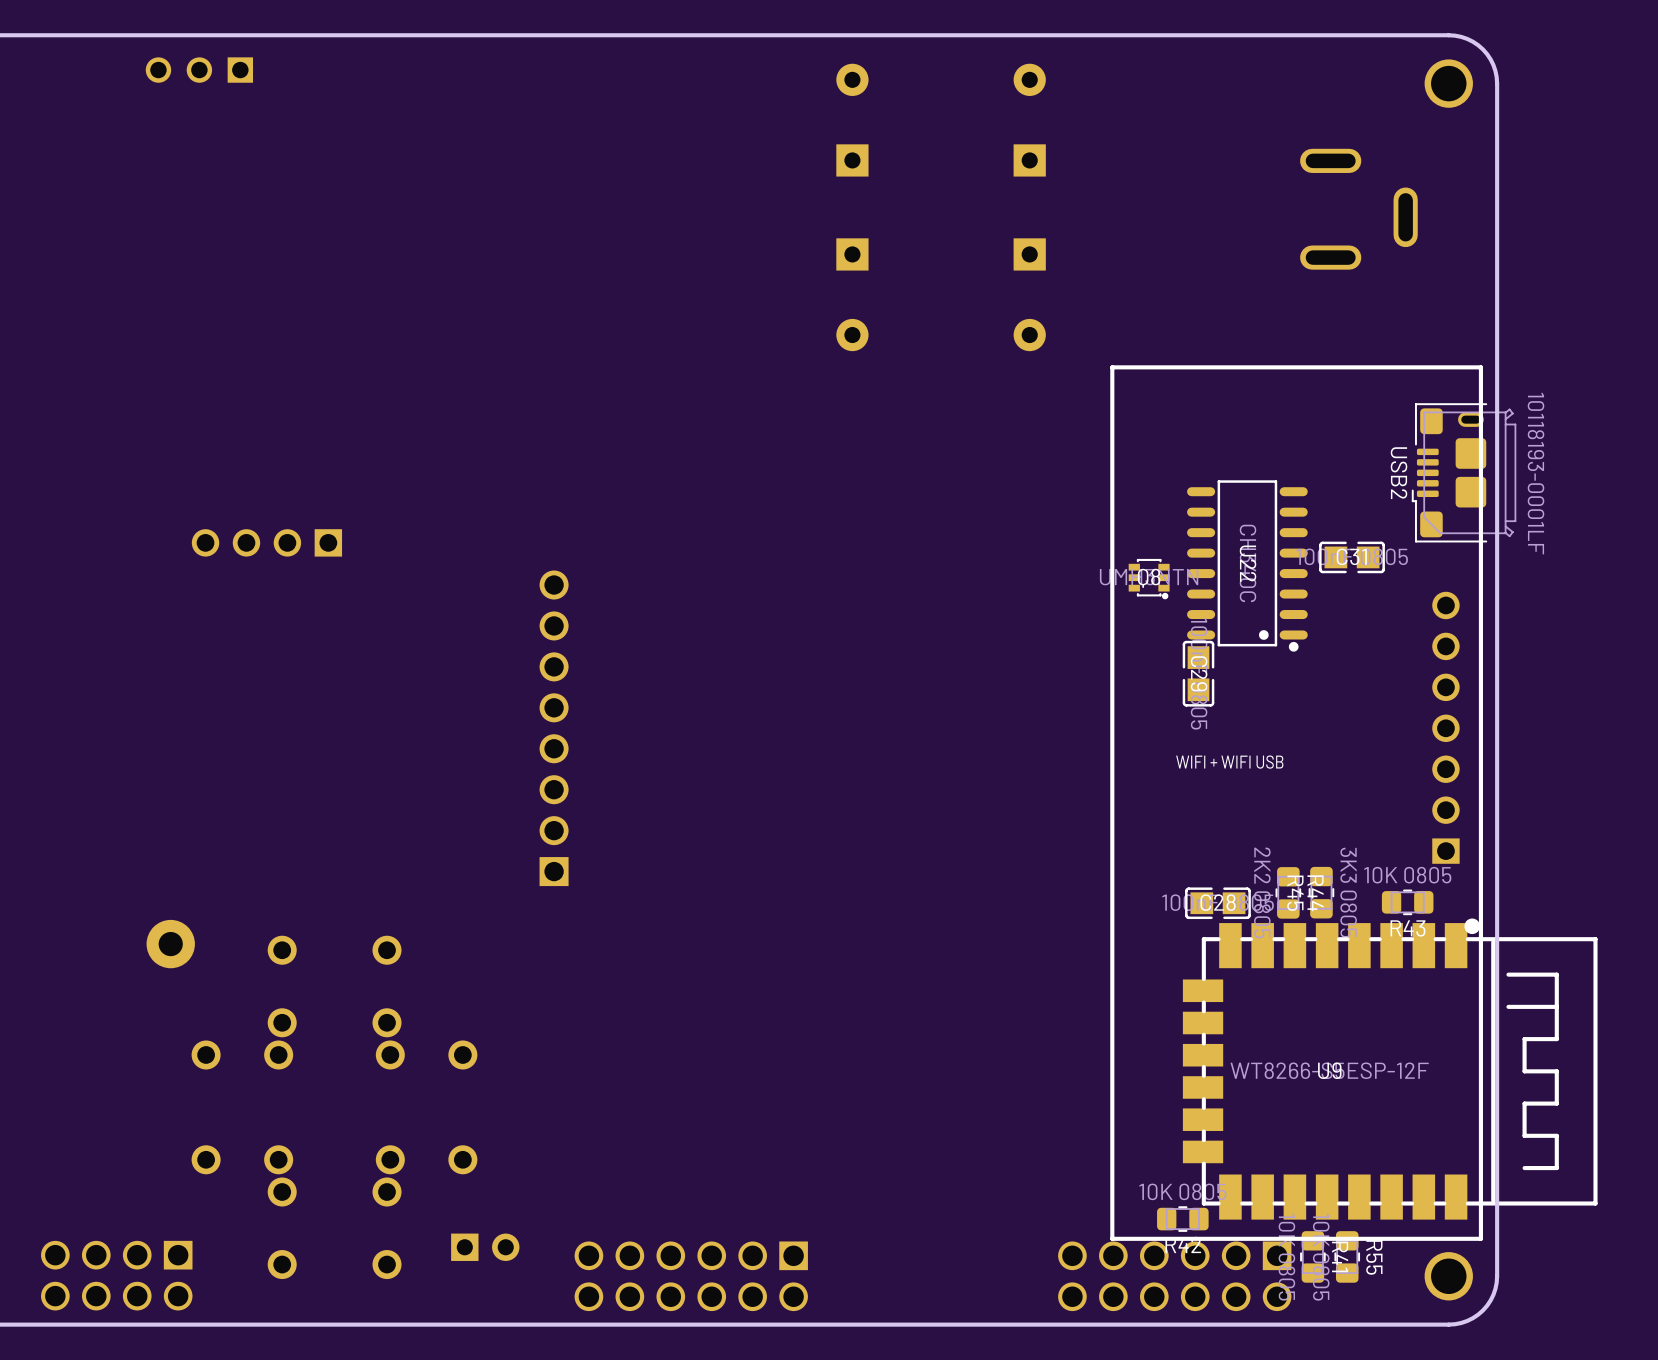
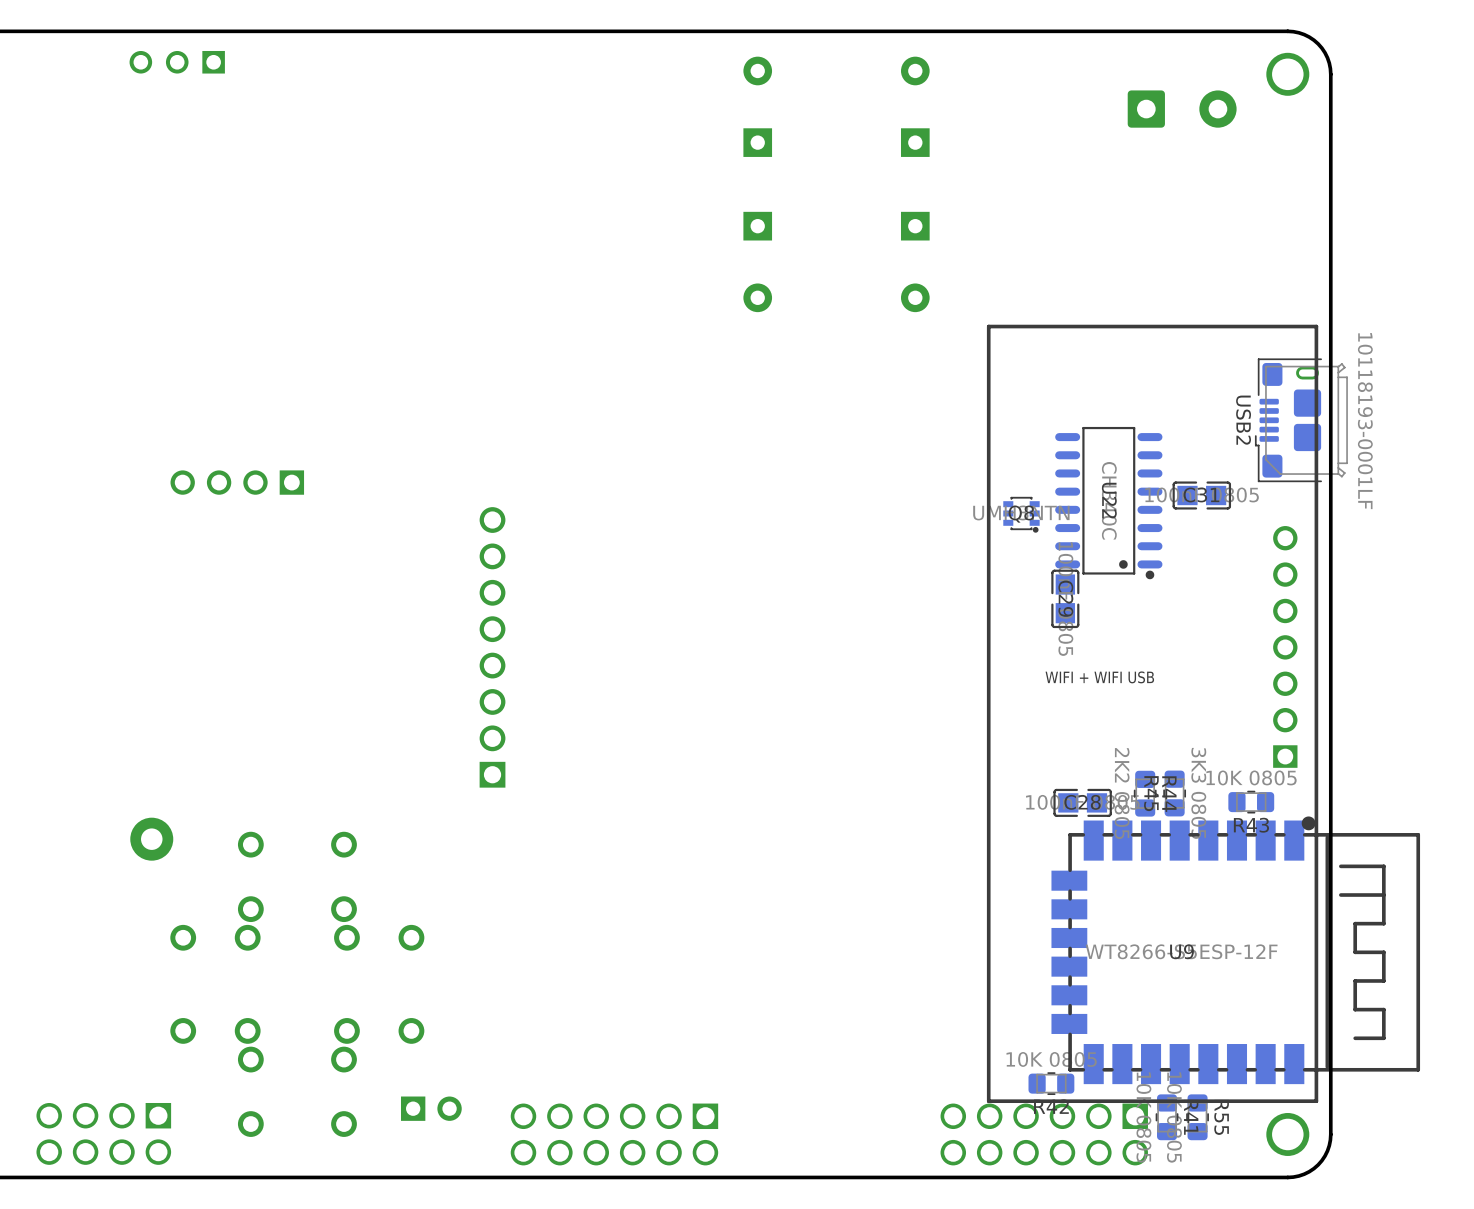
part: none -> (1182, 109)
part: (1358, 209) -> none

